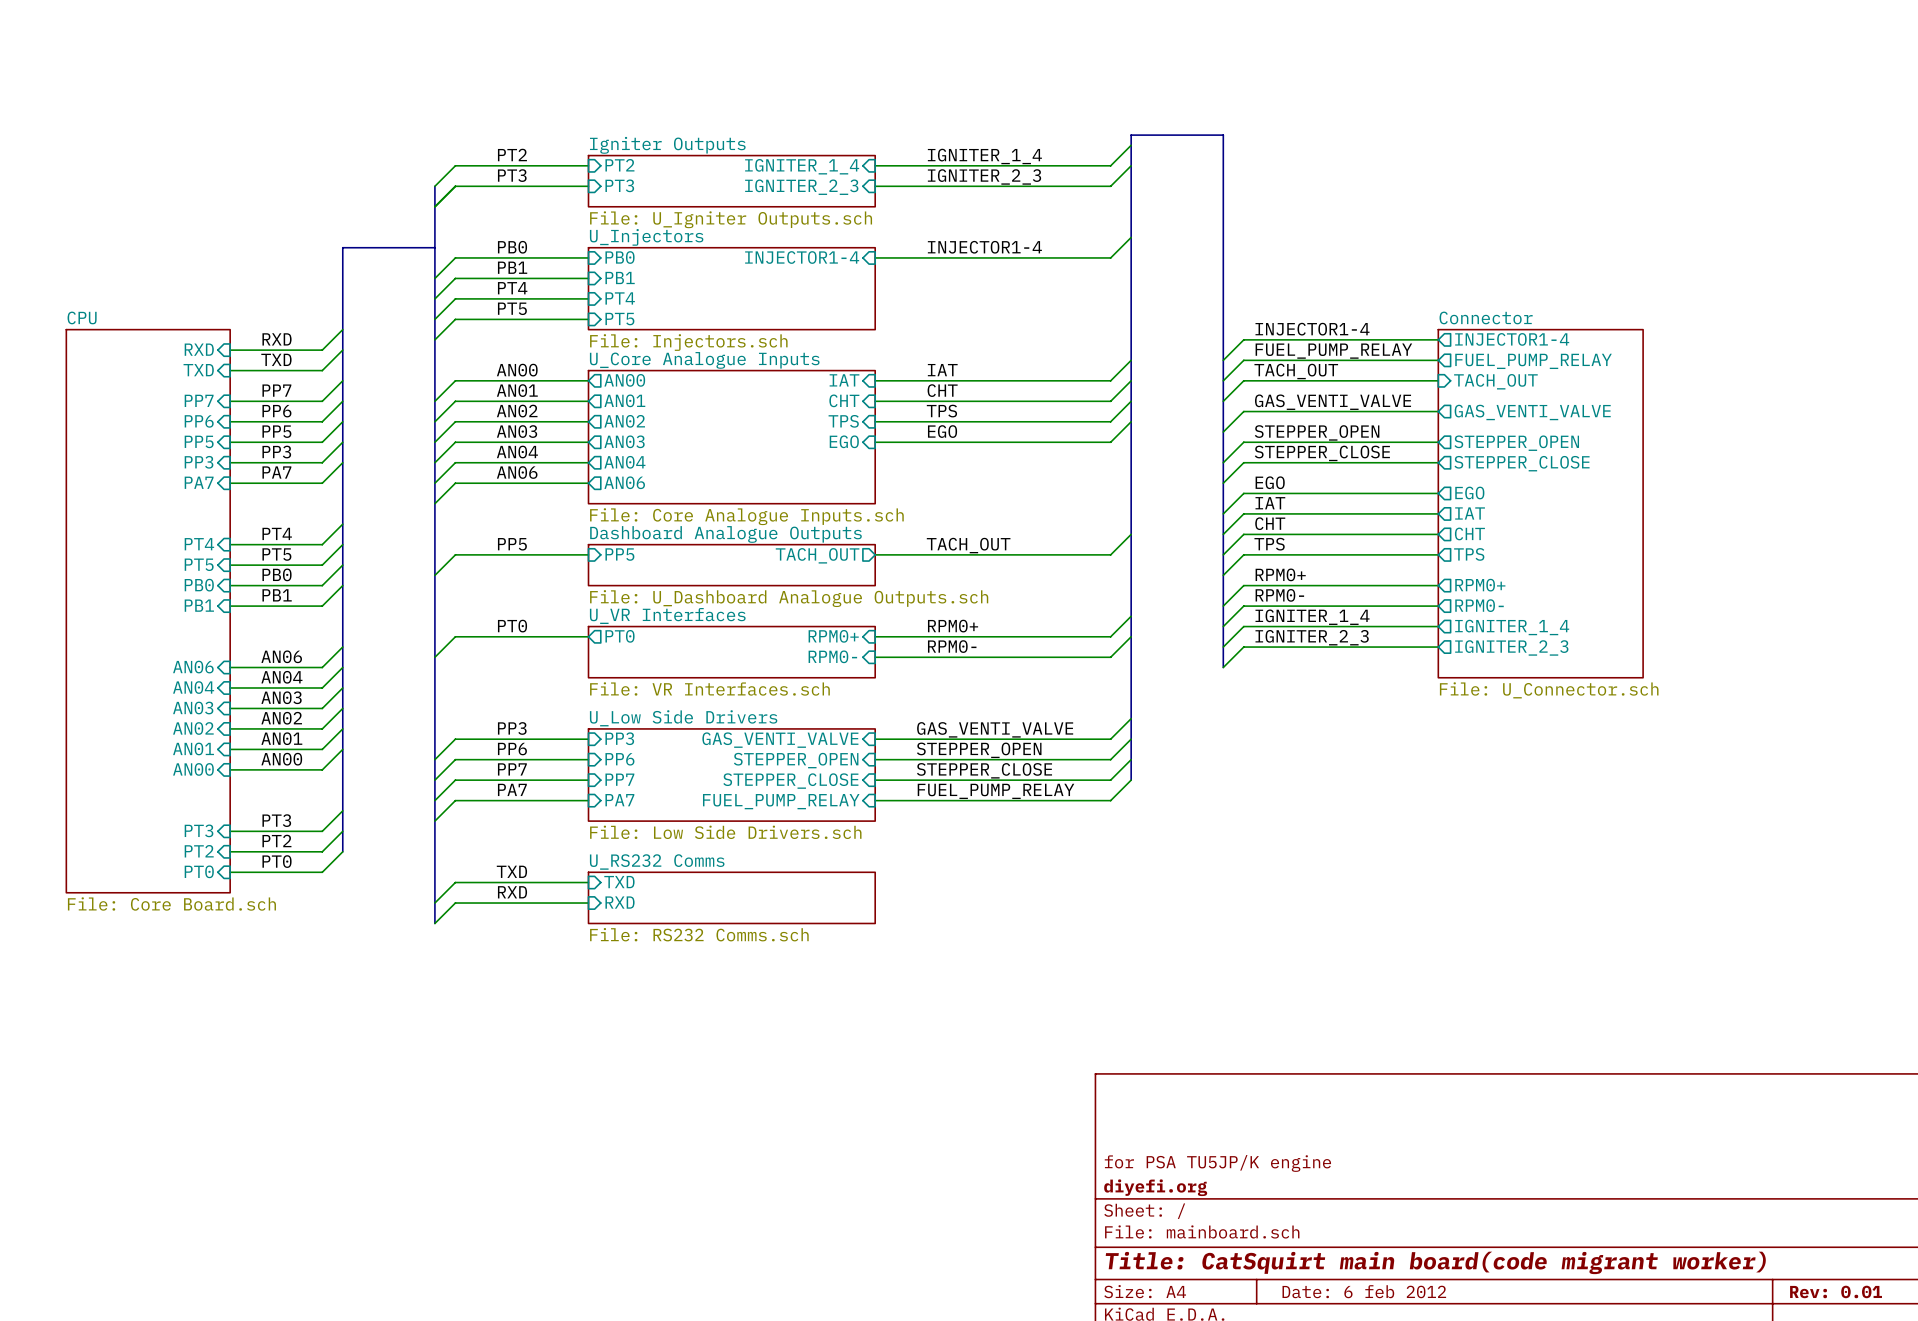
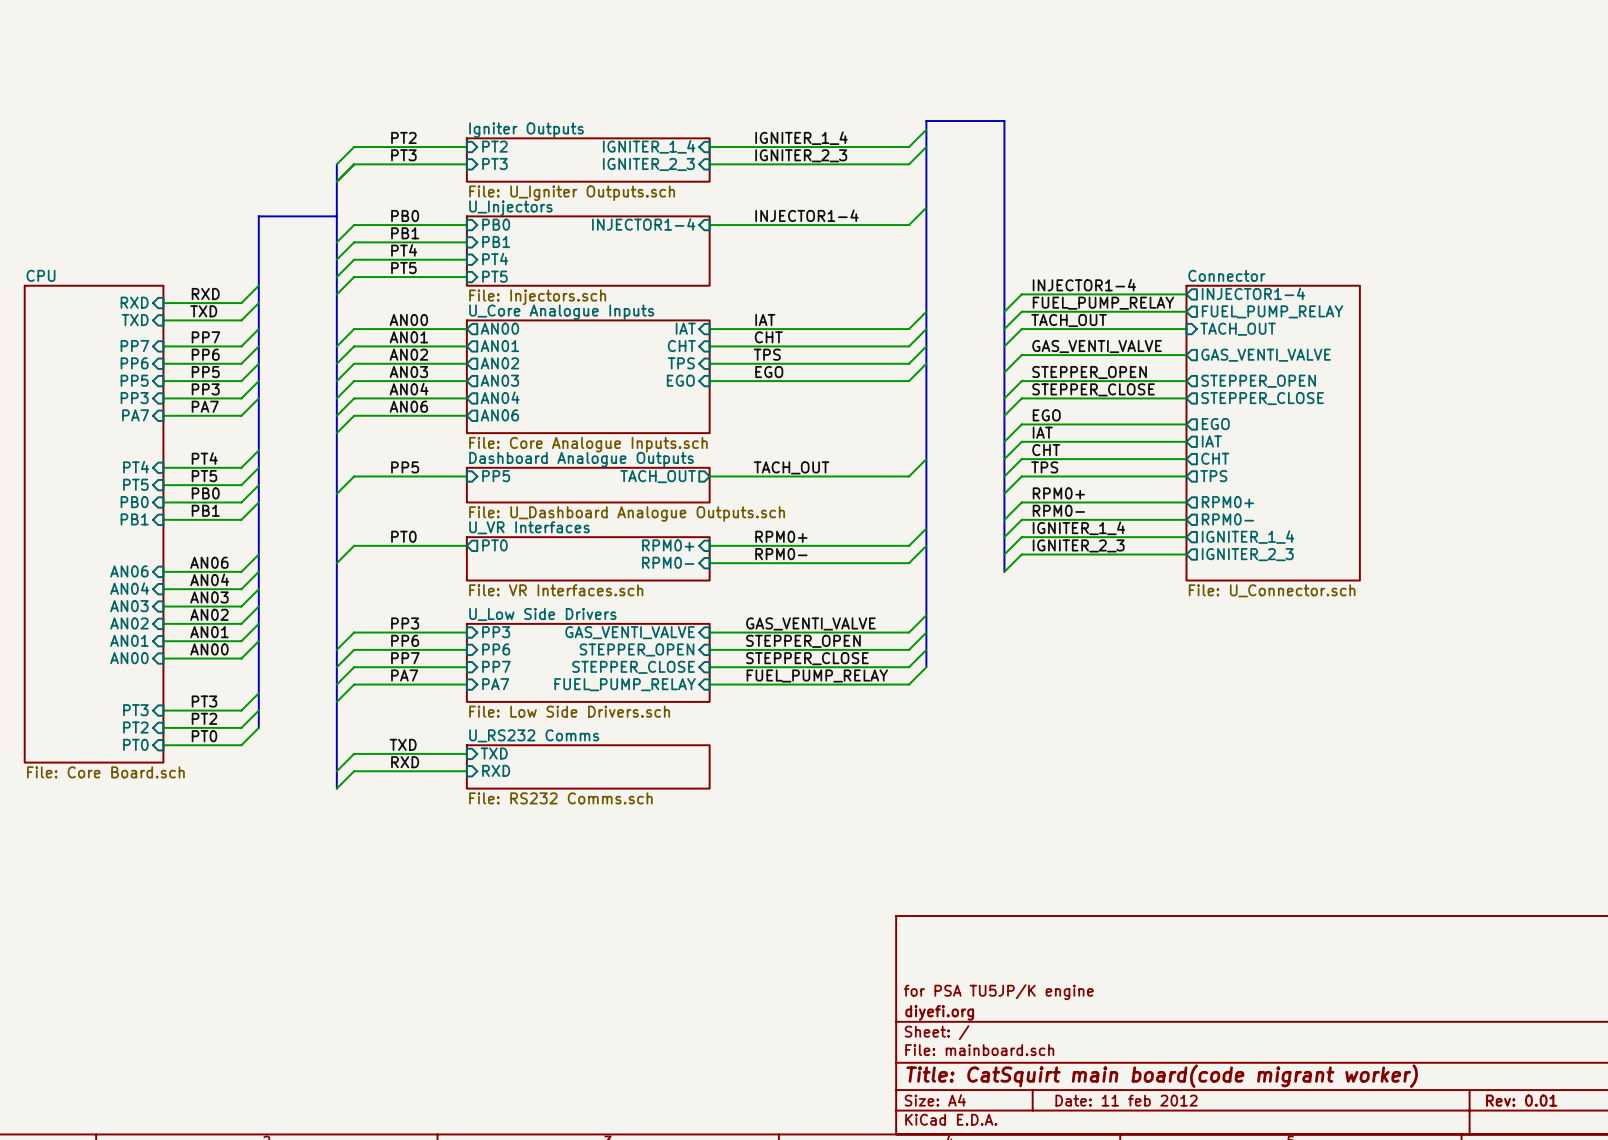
title block: Date: 6 feb 2012 (1364, 1291) -> Date: 11 feb 2012 (1126, 1100)

